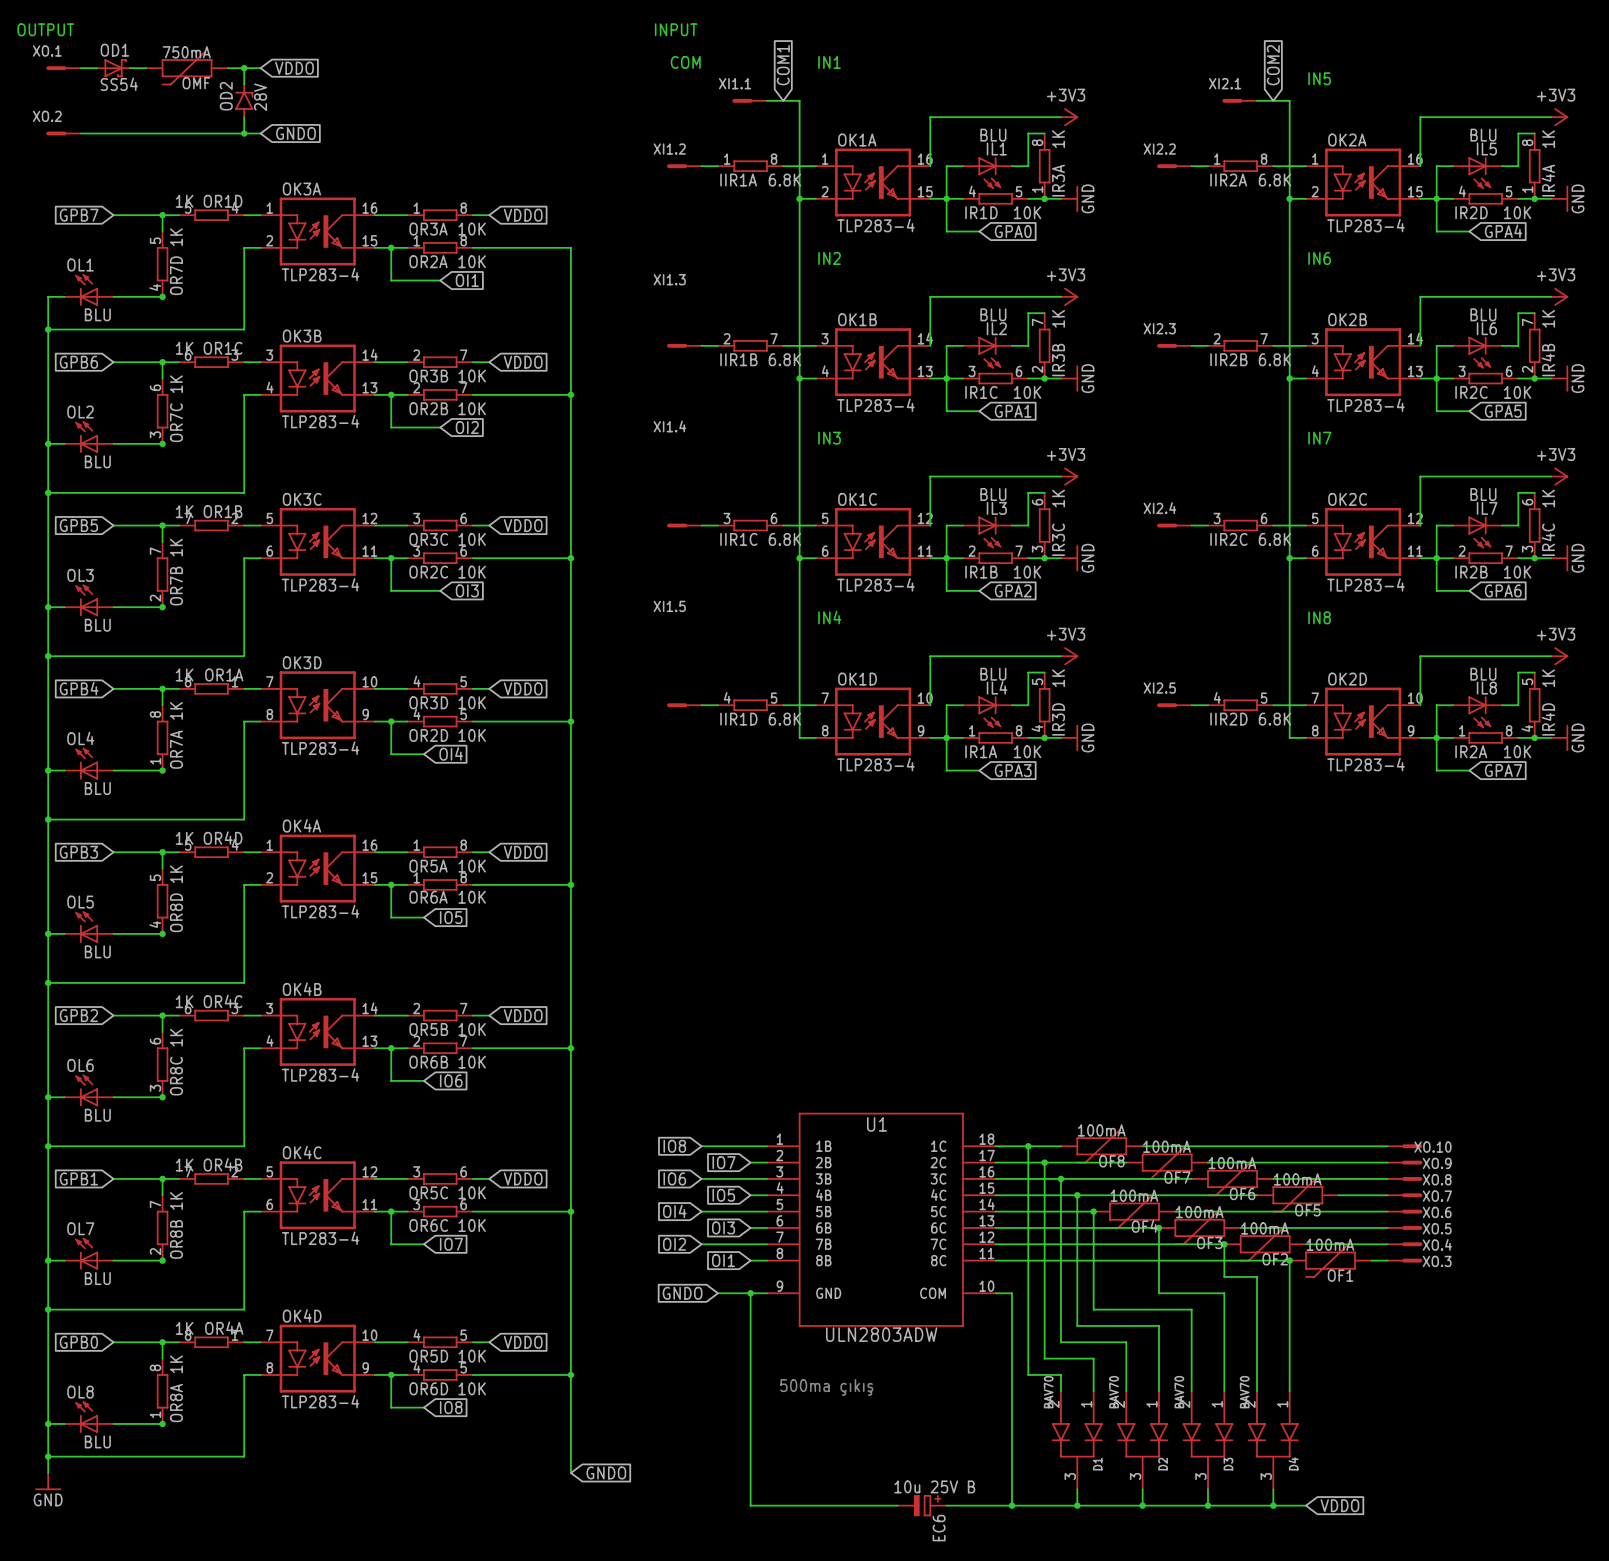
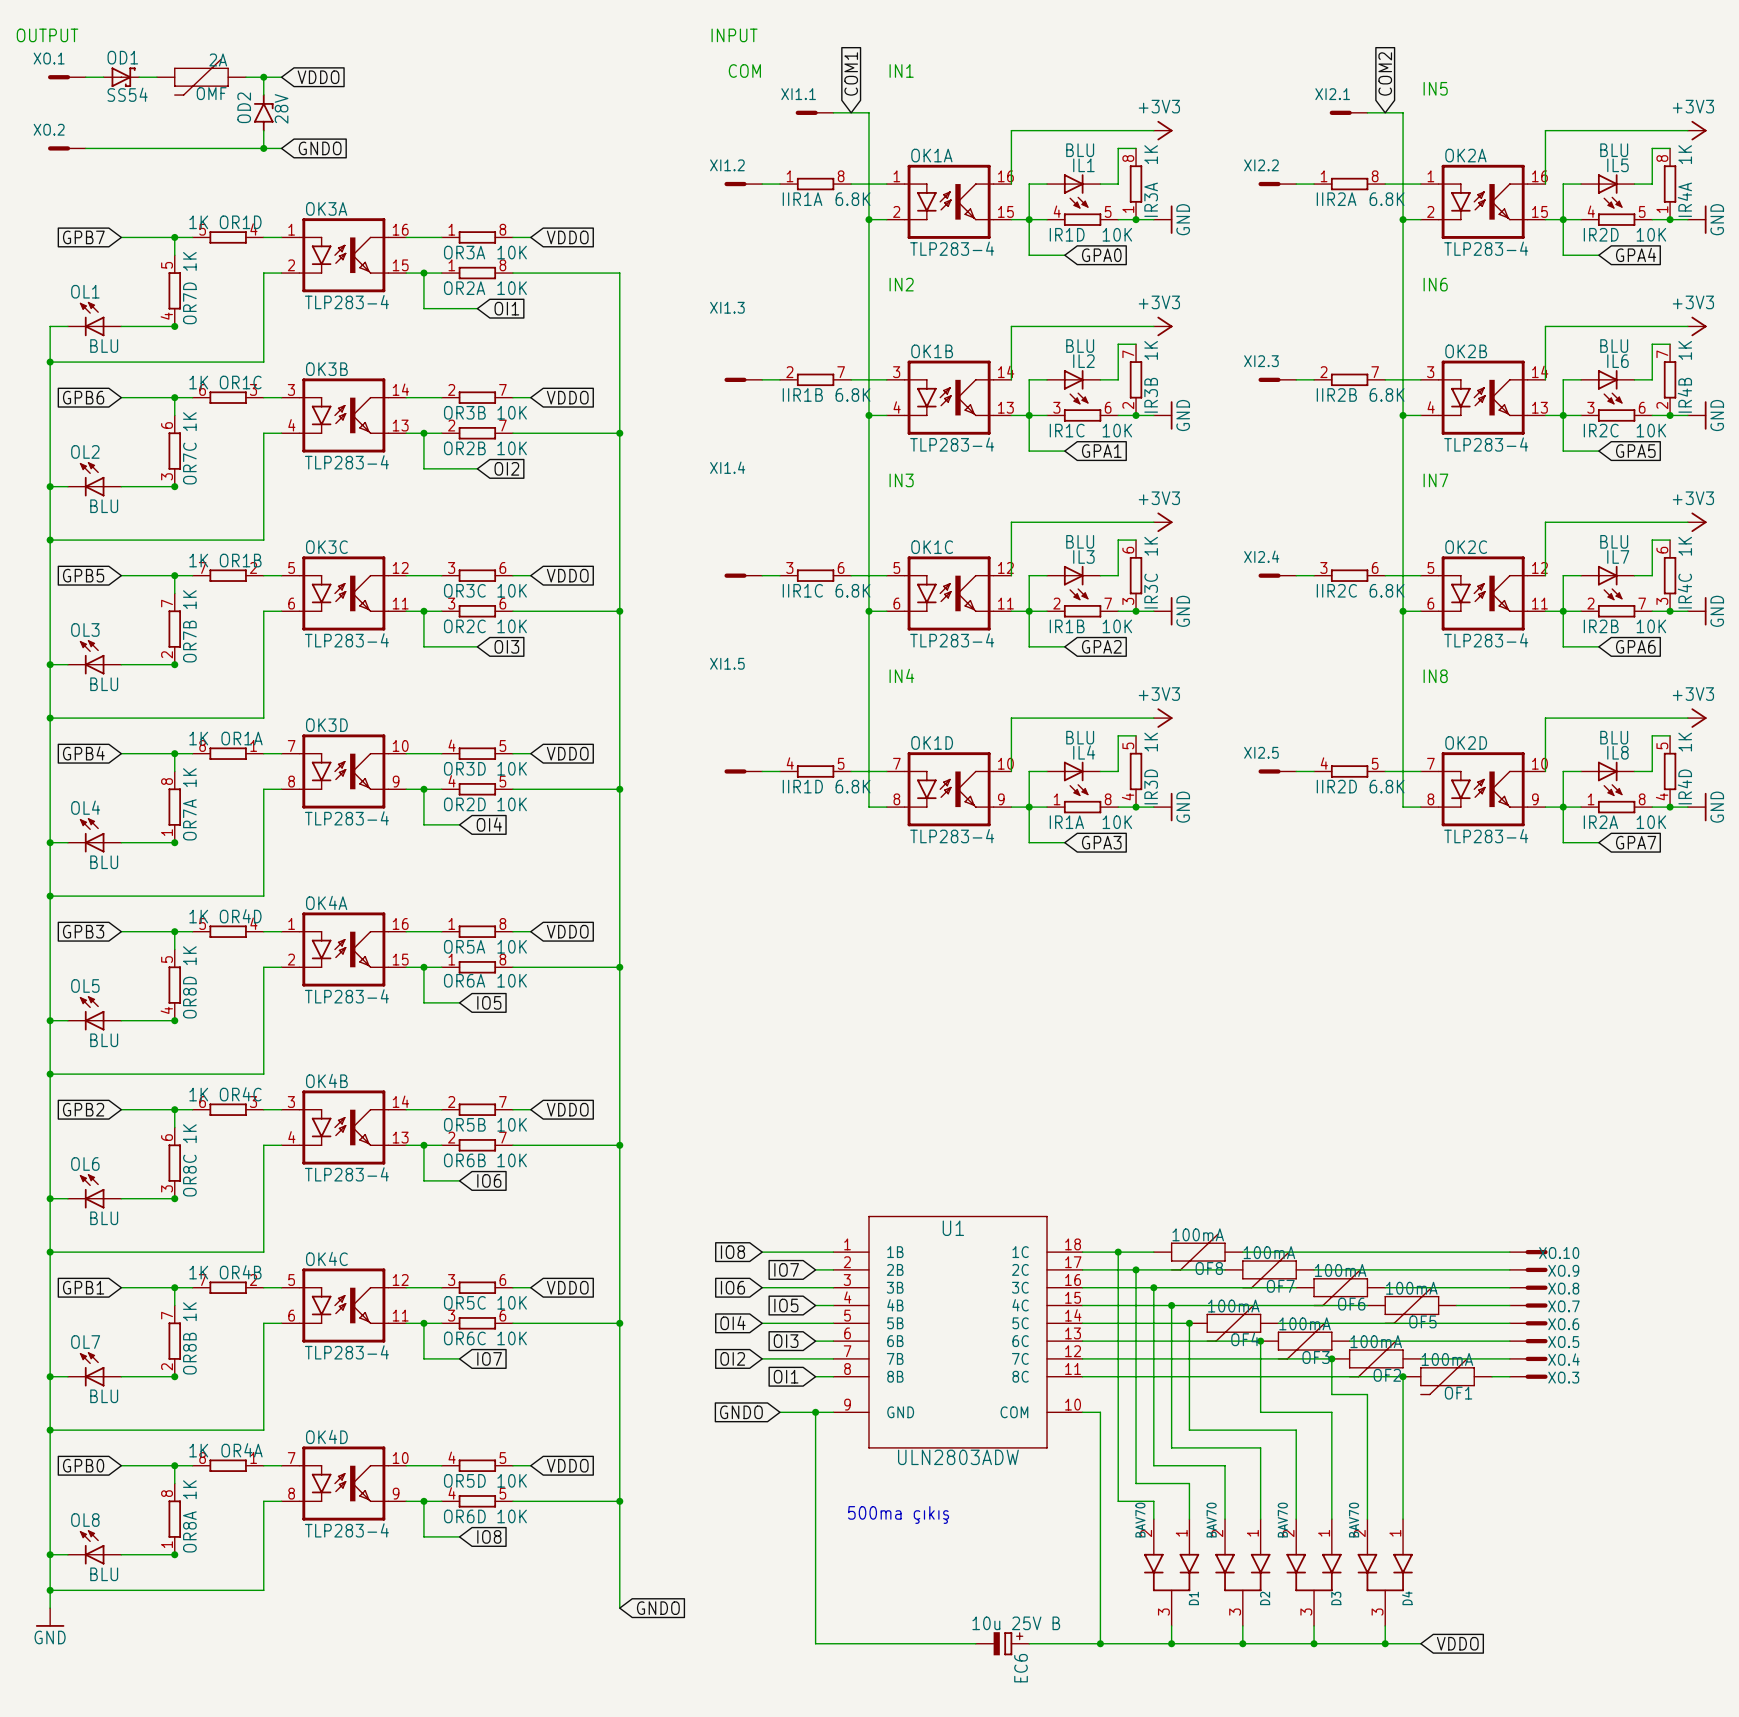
OMF value: 750mA (186, 52) -> 2A (218, 59)

